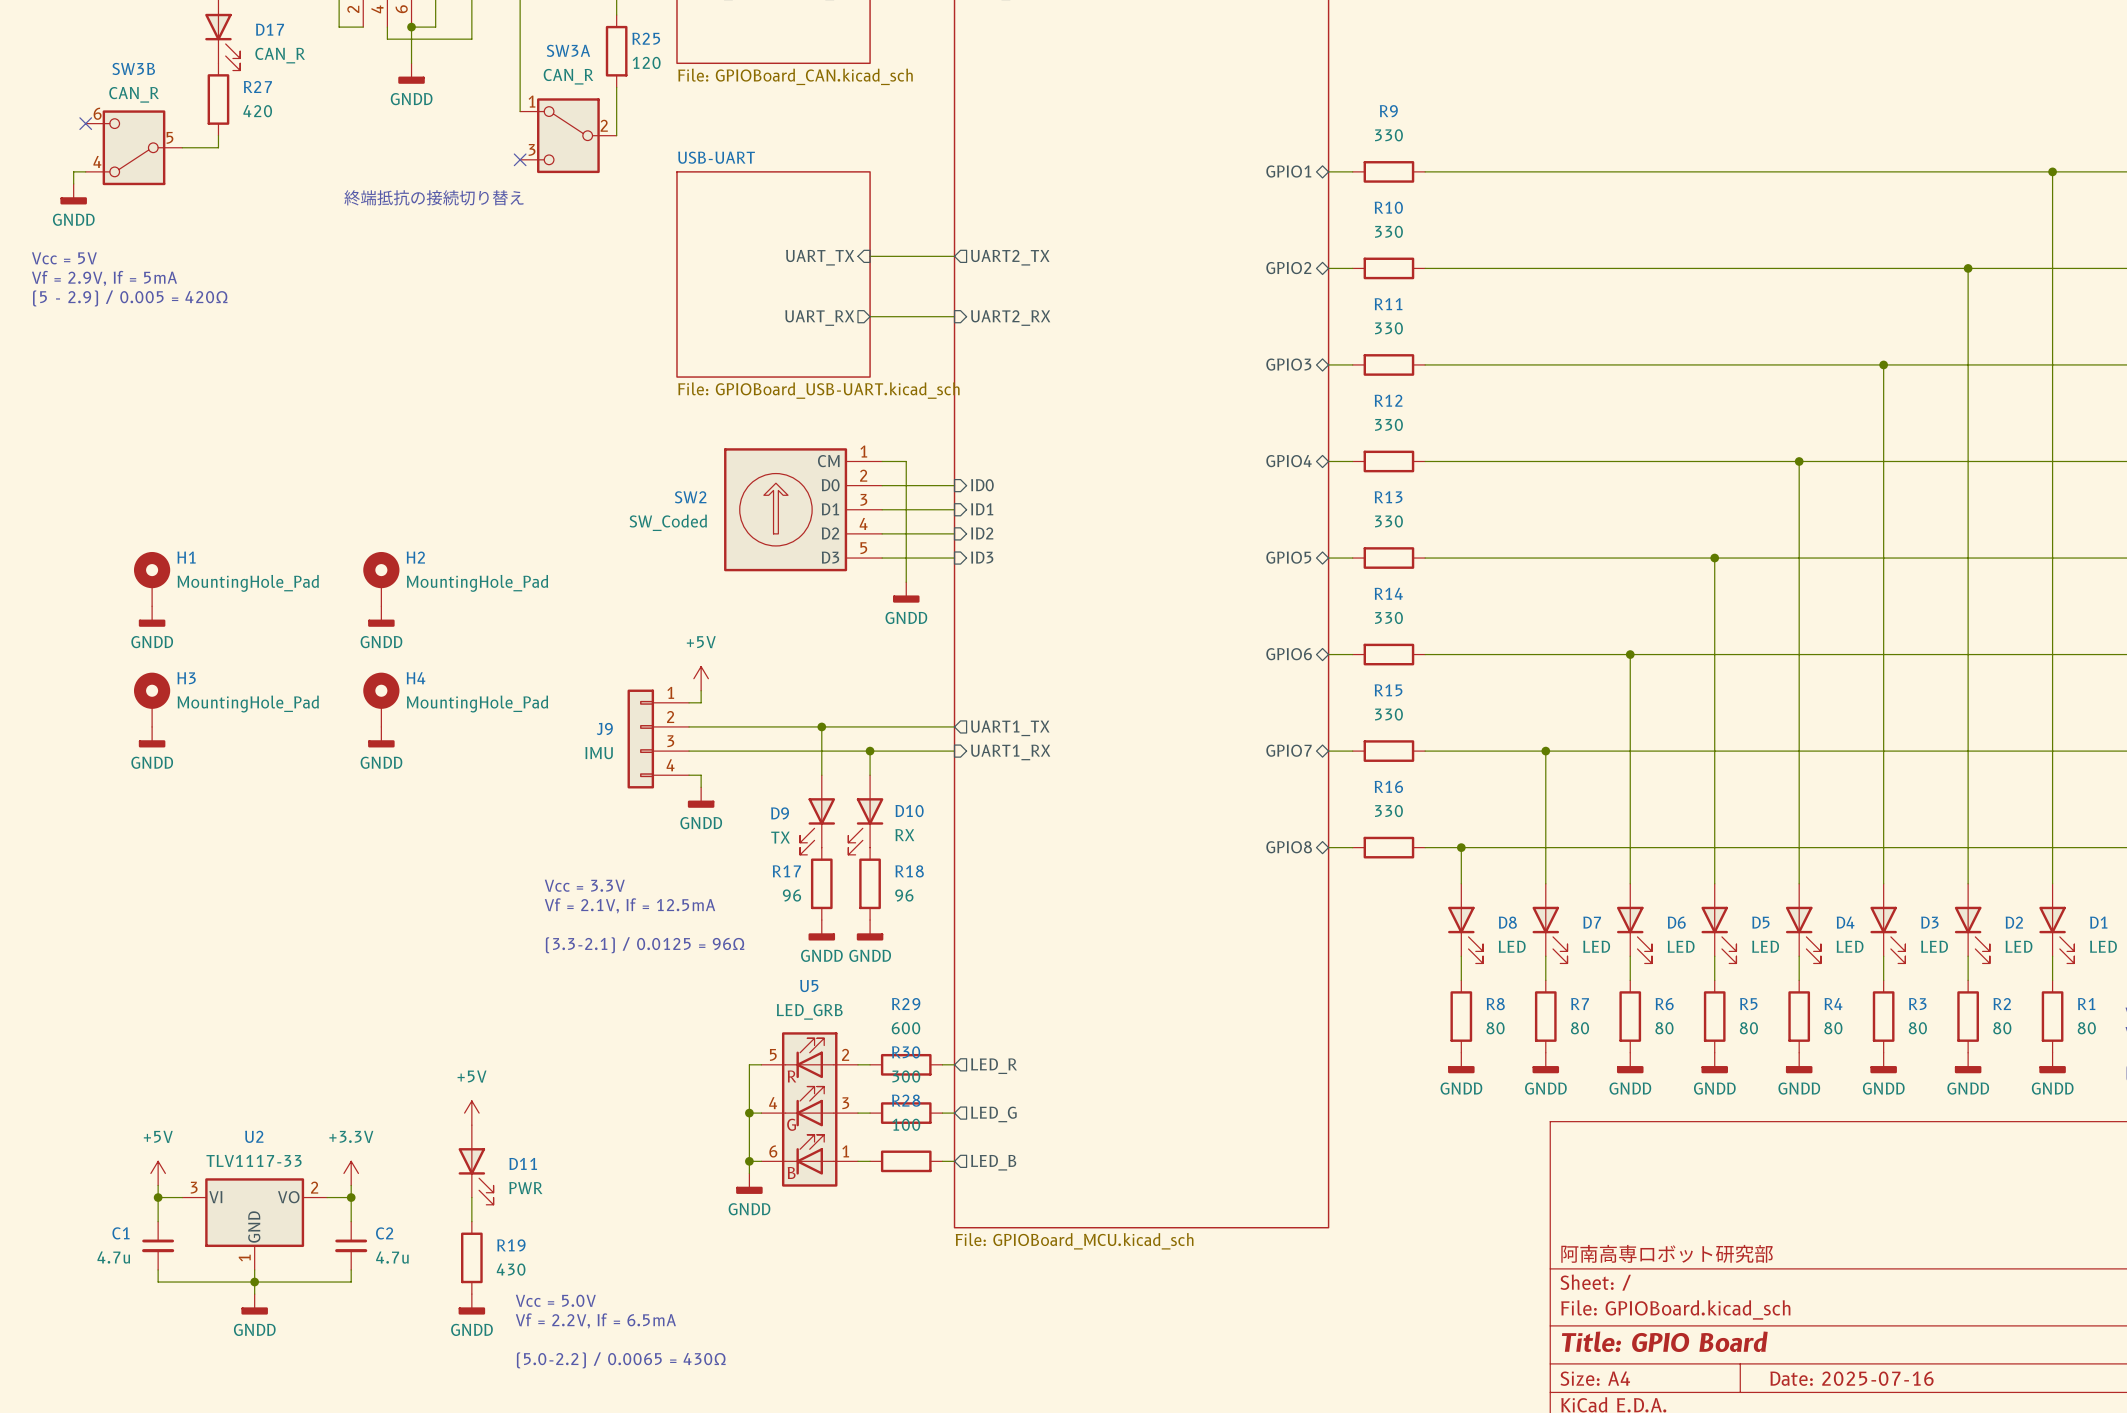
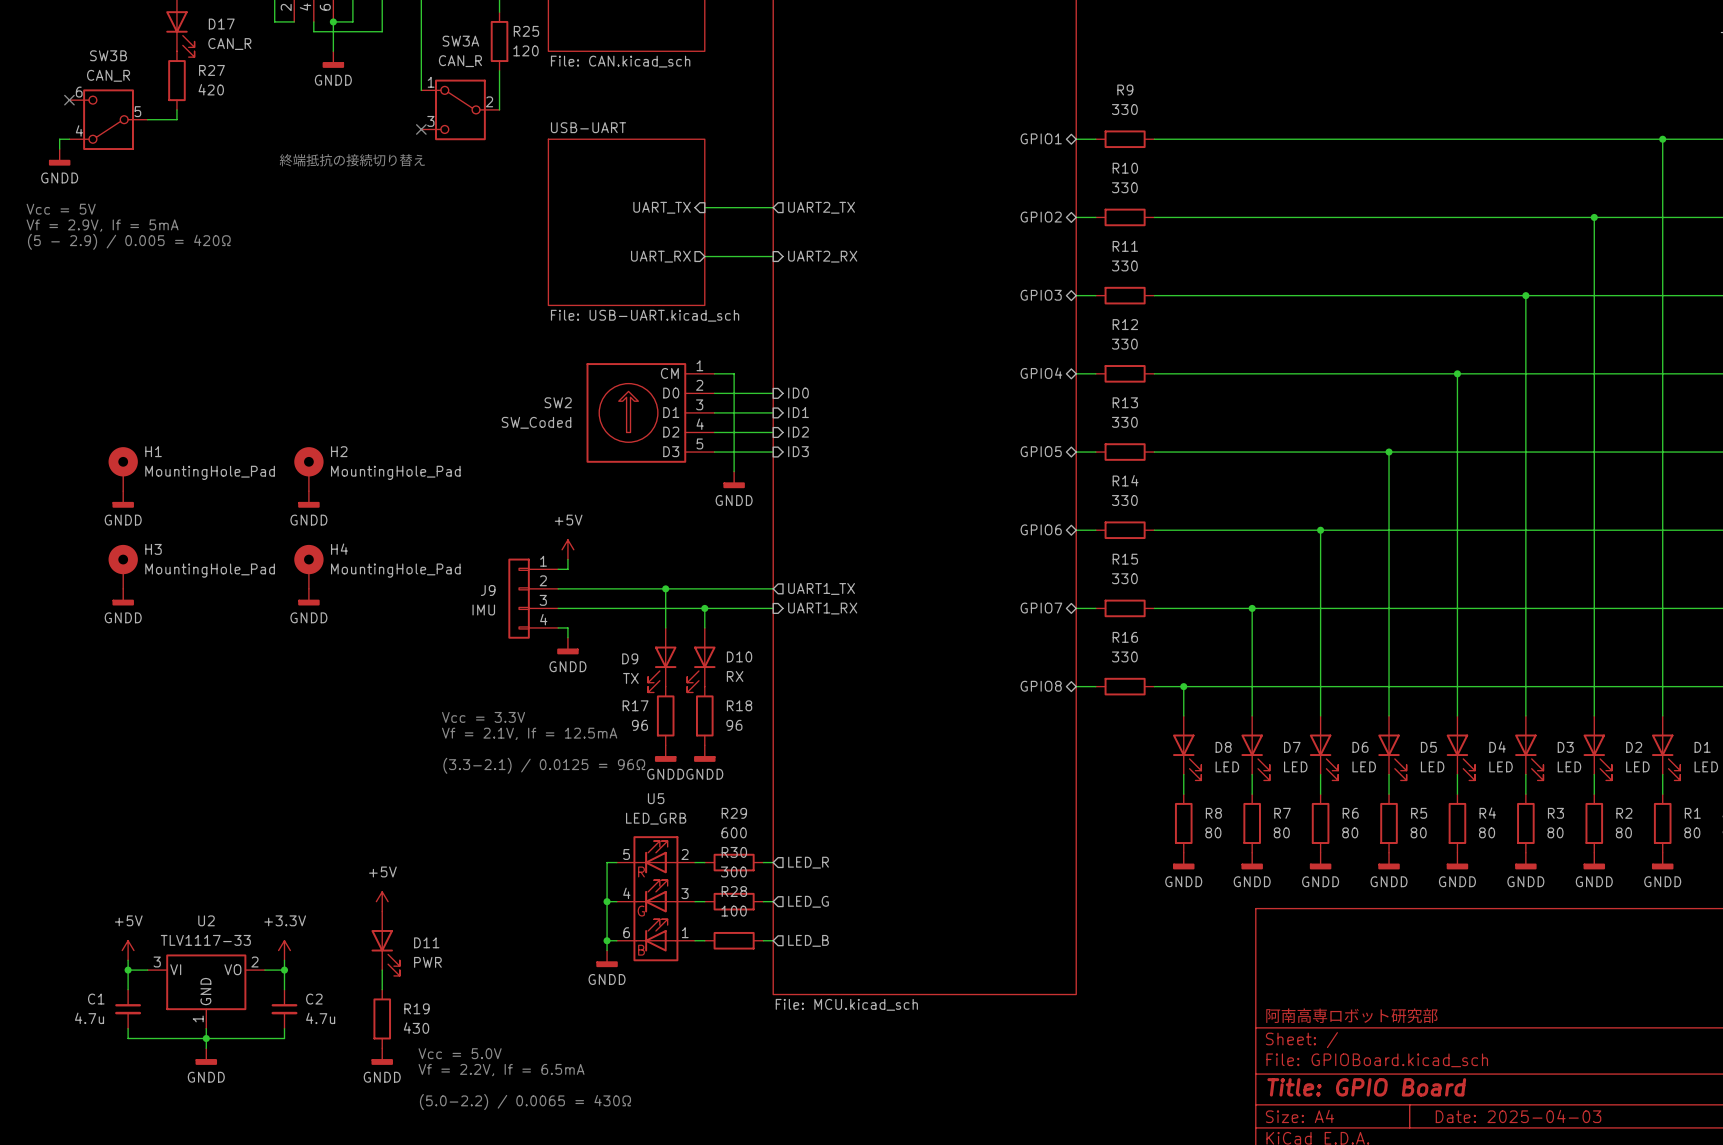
sheet value: File: GPIOBoard_CAN.kicad_sch (795, 76) -> File: CAN.kicad_sch (620, 61)
sheet USB-UART value: File: GPIOBoard_USB-UART.kicad_sch (818, 390) -> File: USB-UART.kicad_sch (645, 315)
sheet value: File: GPIOBoard_MCU.kicad_sch (1074, 1241) -> File: MCU.kicad_sch (846, 1004)
title block: Date: 2025-07-16 (1851, 1378) -> Date: 2025-04-03 (1518, 1116)

